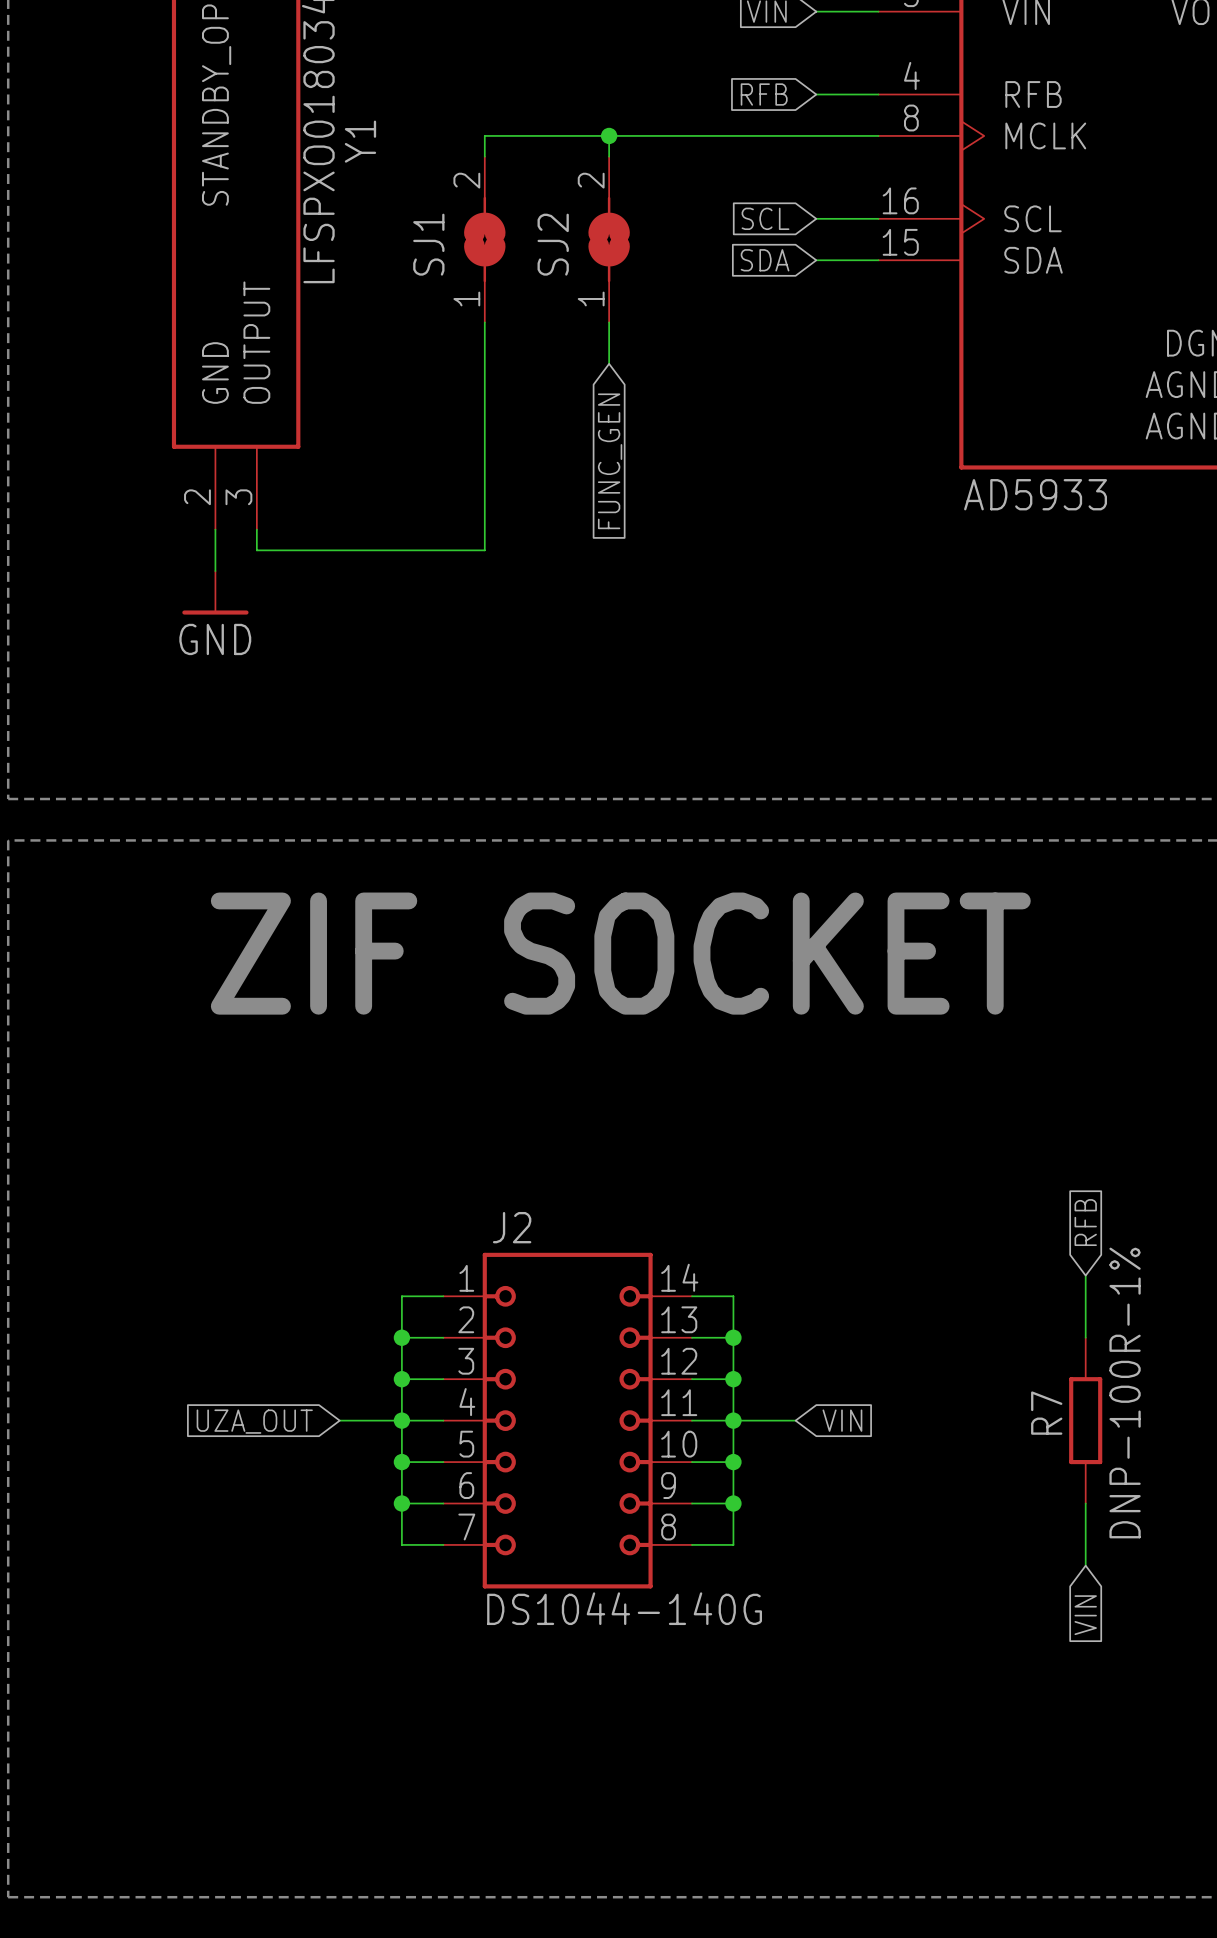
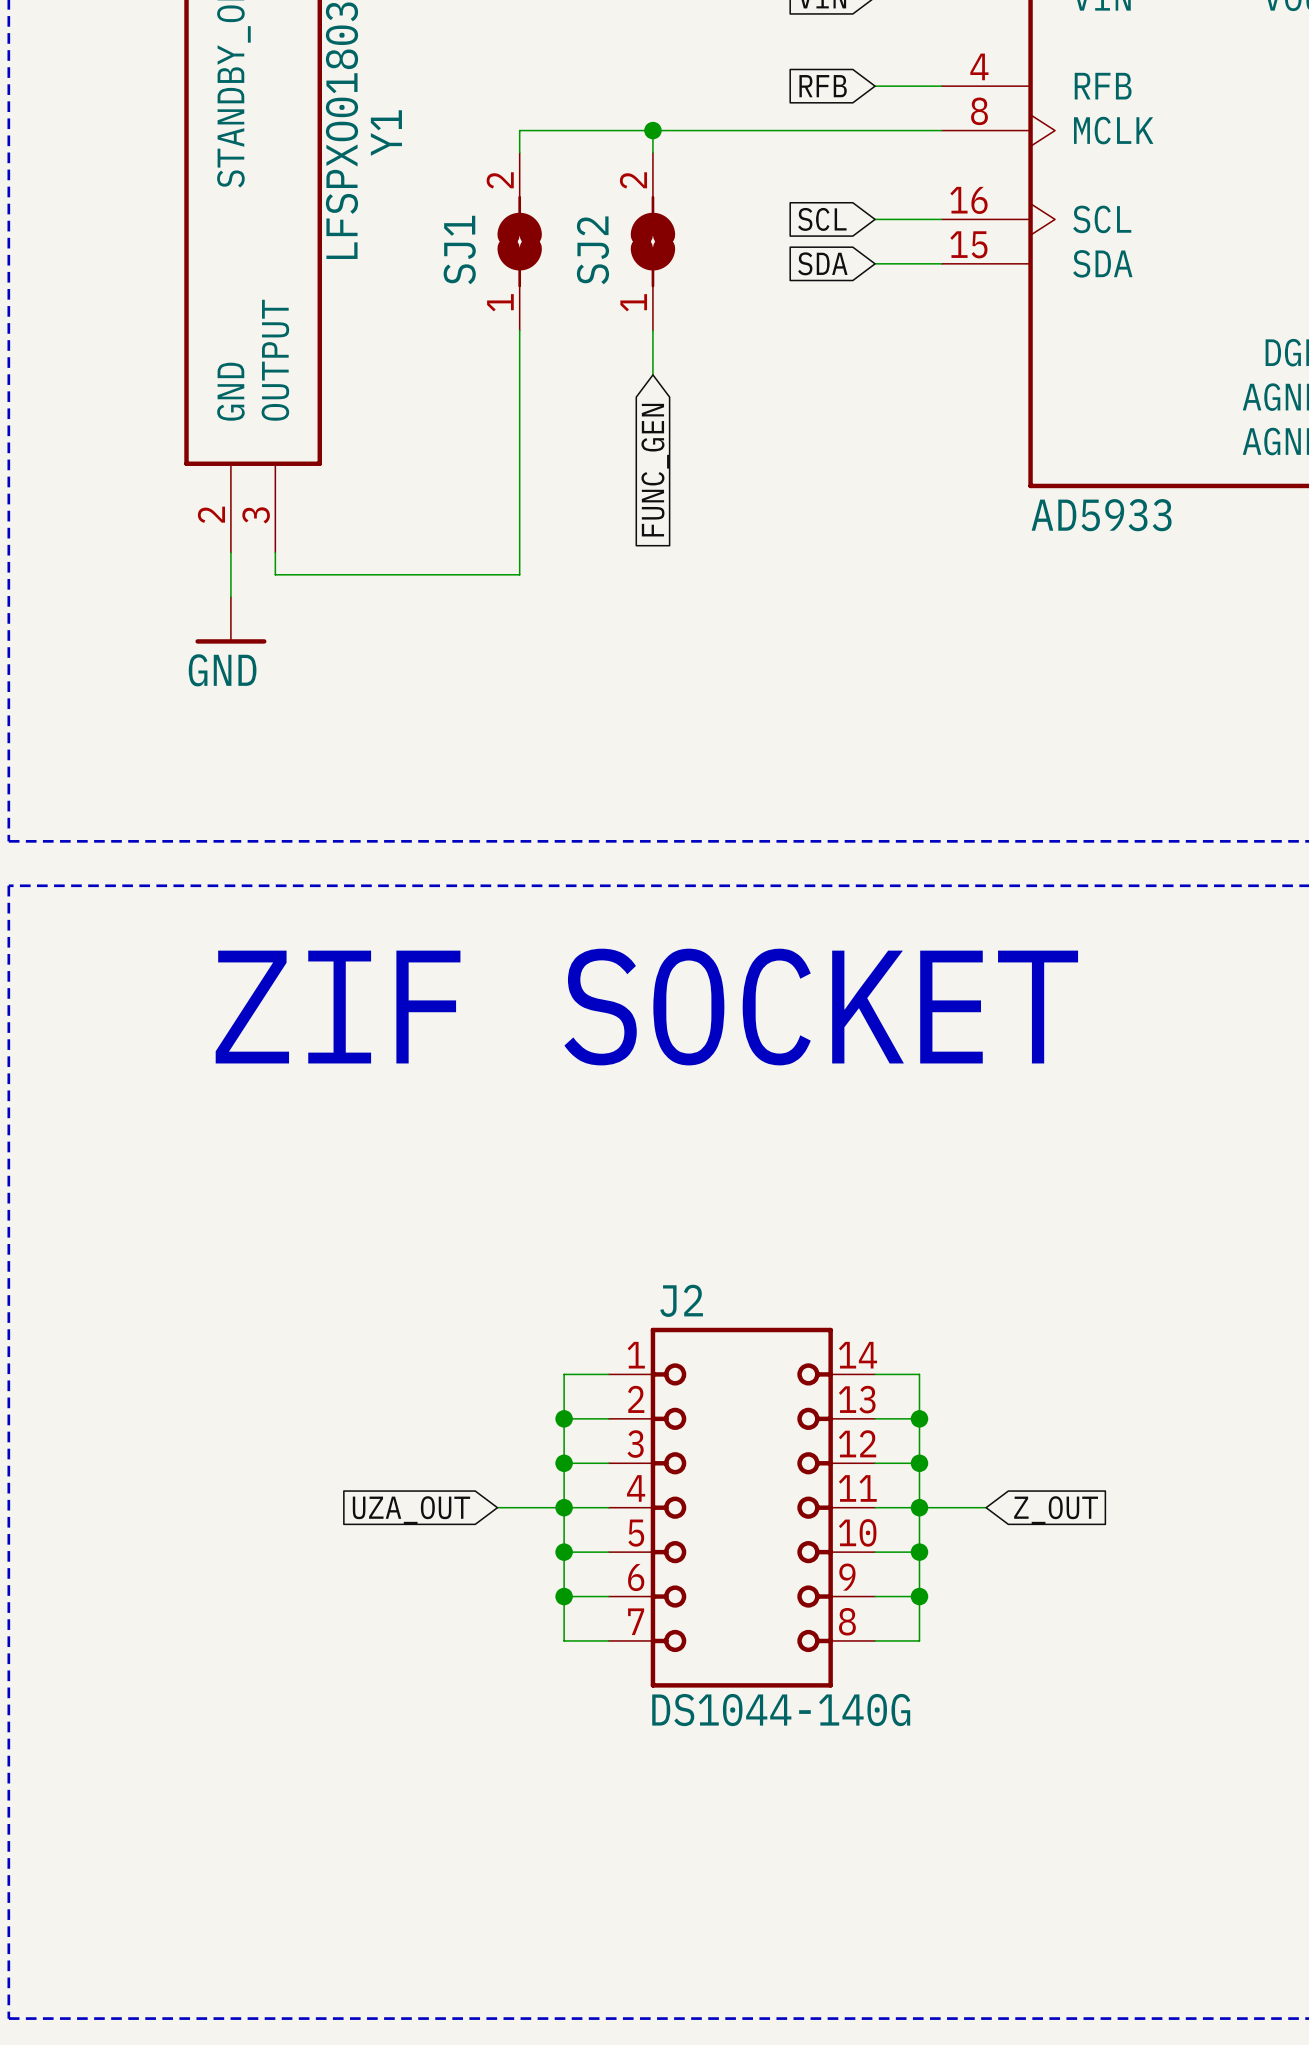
global label: RFB (1085, 1222) -> none
wire: (1085, 1275) (1085, 1337) -> none
wire: (443, 1296) (401, 1296) (401, 1544) (443, 1544) -> (608, 1374) (564, 1374) (564, 1640) (608, 1640)
wire: (692, 1296) (733, 1296) (733, 1544) (692, 1544) -> (875, 1374) (919, 1374) (919, 1640) (875, 1640)
wire: (401, 1337) (443, 1337) -> (564, 1418) (608, 1418)
junction: (401, 1337) -> none
junction: none -> (564, 1418)
wire: (692, 1337) (733, 1337) -> (875, 1418) (919, 1418)
junction: (733, 1337) -> none
junction: none -> (919, 1418)
wire: (401, 1379) (443, 1379) -> (564, 1463) (608, 1463)
junction: (401, 1379) -> none
junction: none -> (564, 1463)
wire: (692, 1379) (733, 1379) -> (875, 1463) (919, 1463)
junction: (733, 1379) -> none
junction: none -> (919, 1463)
wire: (339, 1420) (443, 1420) -> (497, 1507) (608, 1507)
junction: (401, 1420) -> none
junction: none -> (564, 1507)
J2 position: (567, 1420) -> (741, 1507)
wire: (692, 1420) (795, 1420) -> (875, 1507) (986, 1507)
junction: (733, 1420) -> none
global label: VIN (842, 1420) -> none
junction: none -> (919, 1507)
R7: DNP-100R-1% (1085, 1420) -> none
global label position: UZA_OUT (254, 1421) -> UZA_OUT (411, 1510)
global label: none -> Z_OUT (1056, 1510)
wire: (401, 1462) (443, 1462) -> (564, 1552) (608, 1552)
junction: (401, 1462) -> none
junction: none -> (564, 1552)
wire: (692, 1462) (733, 1462) -> (875, 1552) (919, 1552)
junction: (733, 1462) -> none
junction: none -> (919, 1552)
wire: (401, 1503) (443, 1503) -> (564, 1596) (608, 1596)
junction: (401, 1503) -> none
junction: none -> (564, 1596)
wire: (692, 1503) (733, 1503) -> (875, 1596) (919, 1596)
junction: (733, 1503) -> none
junction: none -> (919, 1596)
wire: (1085, 1503) (1085, 1565) -> none
global label: VIN (1085, 1615) -> none

